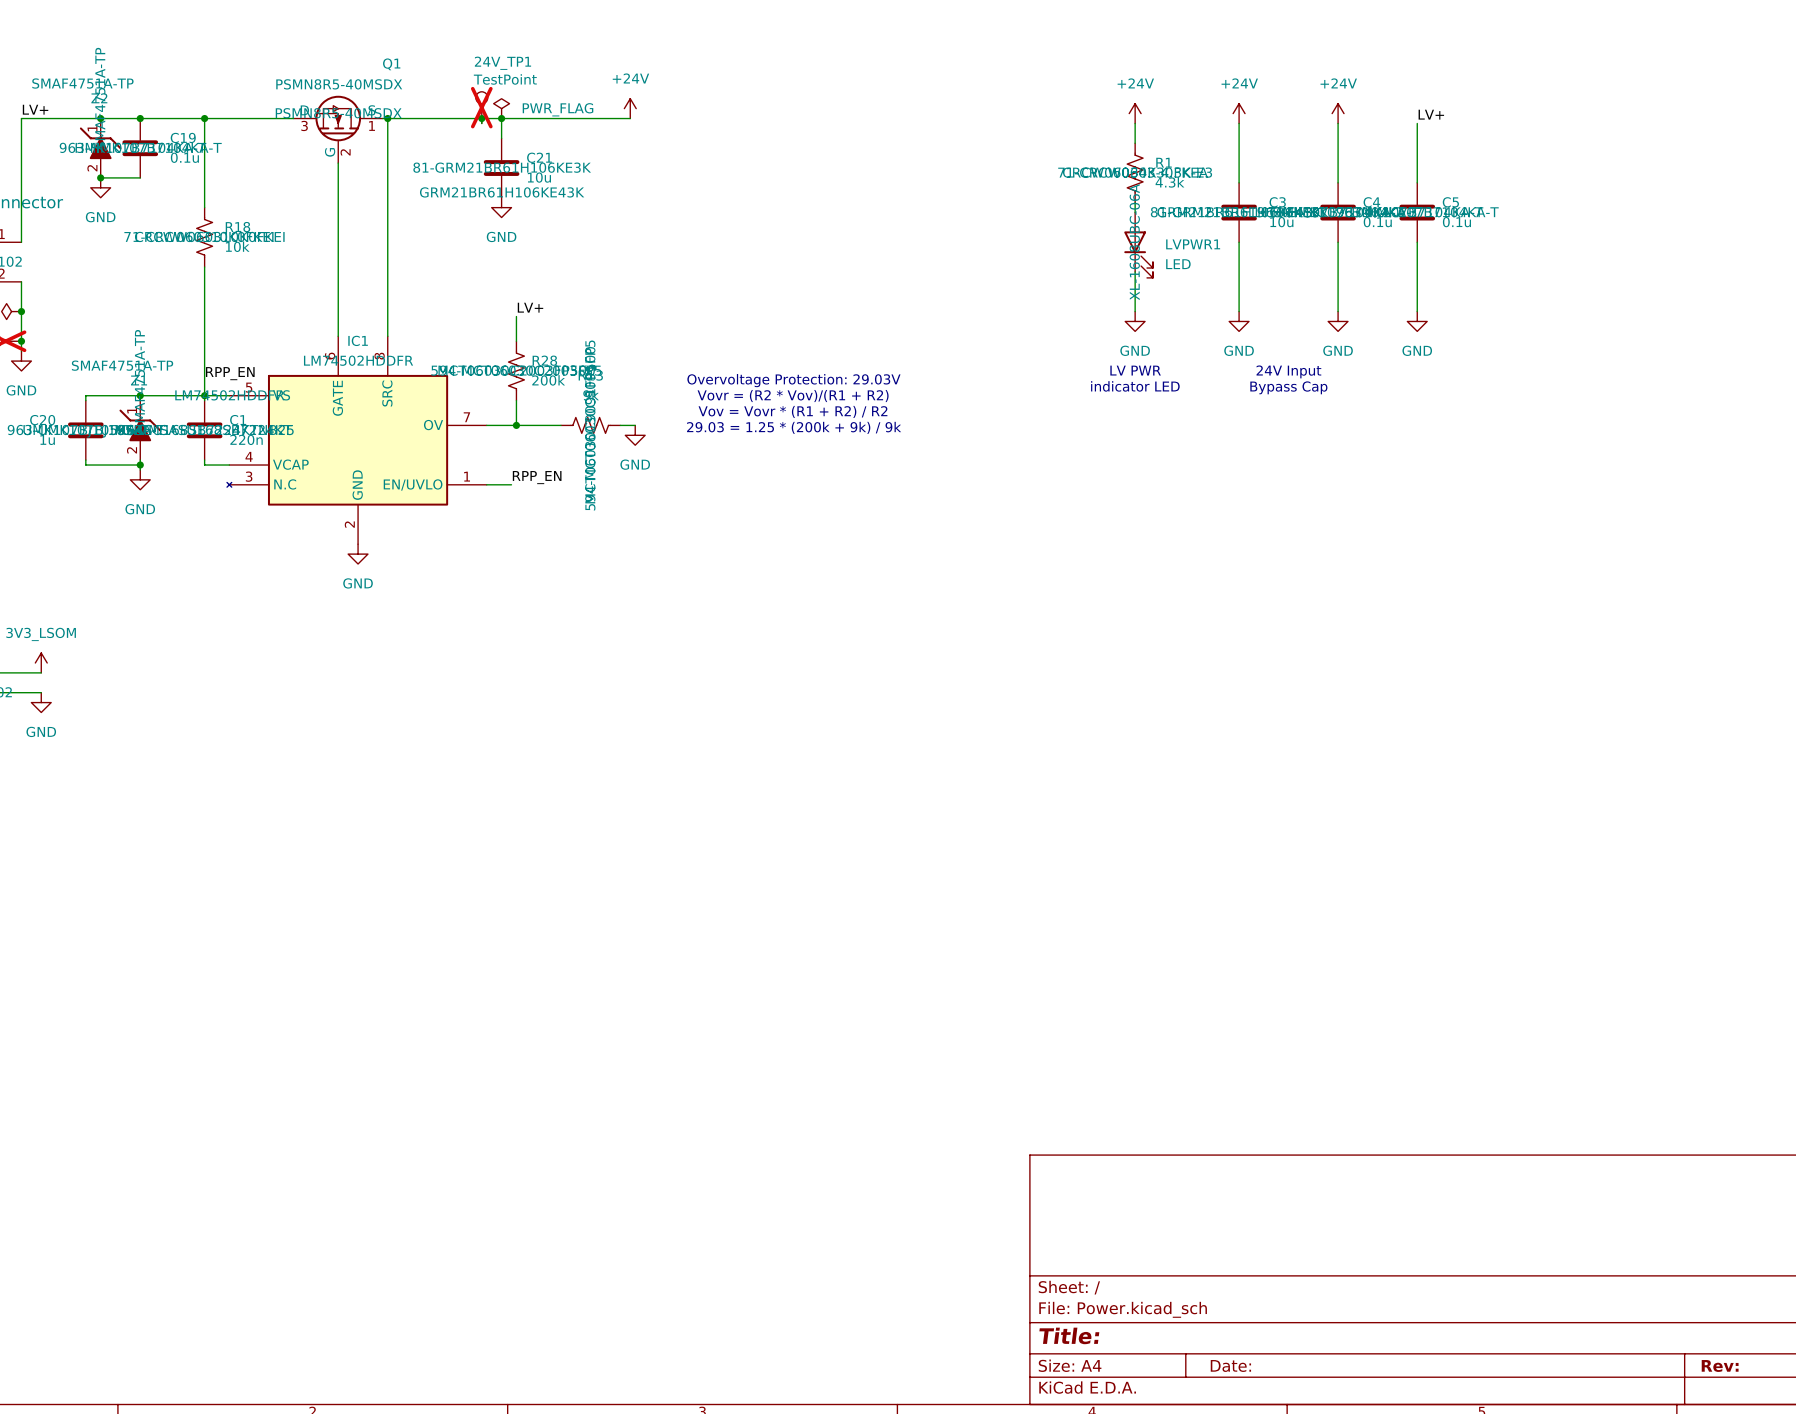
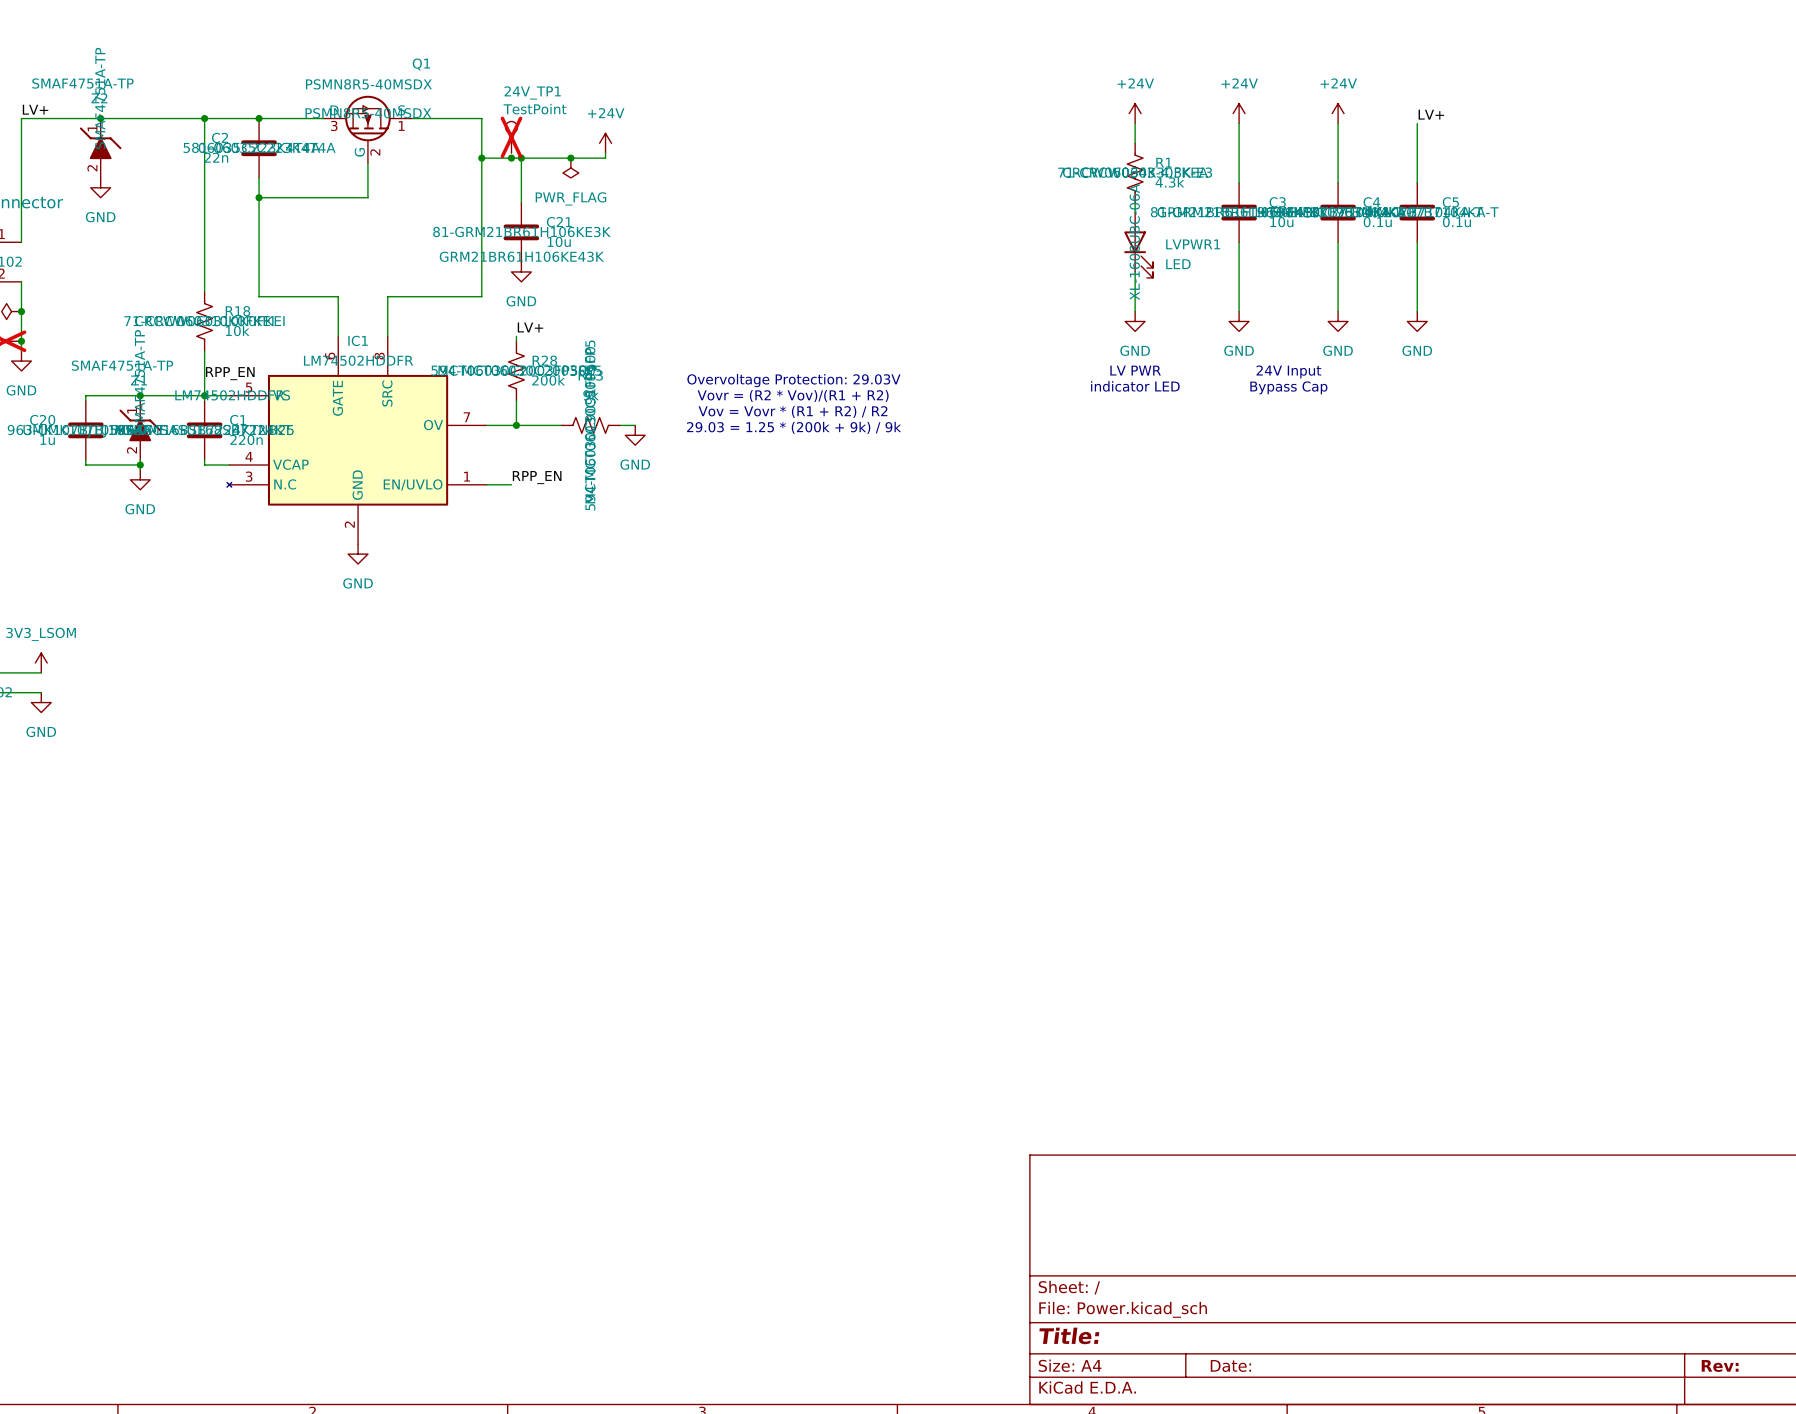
24V_TP1 position: (481, 107) -> (511, 137)
power symbol rotation: 0° (501, 108) -> 180° (570, 168)
power symbol position: PWR_FLAG (501, 108) -> PWR_FLAG (570, 168)
power symbol position: +24V (630, 108) -> +24V (605, 143)
power symbol text position: PWR_FLAG (558, 109) -> PWR_FLAG (570, 198)
junction: (140, 118) -> none
junction: none -> (259, 118)
wire: (387, 118) (387, 296) -> (481, 123) (481, 296) (387, 296)
junction: (387, 118) -> none
wire: (481, 118) (630, 118) -> none
junction: (481, 118) -> none
wire: (501, 118) (501, 138) -> none
junction: (501, 118) -> none
Q1 position: (338, 129) -> (367, 129)
C19: 0.1u (140, 148) -> none
C2: none -> 22n (259, 148)
wire: none -> (605, 153) (605, 158) (481, 158)
junction: none -> (481, 158)
junction: none -> (511, 158)
wire: none -> (521, 158) (521, 202)
junction: none -> (521, 158)
junction: none -> (570, 158)
wire: (338, 163) (338, 296) -> (259, 177) (259, 296) (338, 296)
wire: none -> (367, 163) (367, 197) (259, 197)
C21 position: (501, 168) -> (521, 232)
wire: (100, 177) (140, 177) -> none
junction: (100, 177) -> none
junction: none -> (259, 197)
power symbol position: GND (501, 207) -> GND (521, 271)
R18 position: (204, 237) -> (204, 321)
label position: LV+ (530, 307) -> LV+ (530, 327)
wire: (516, 316) (516, 336) -> none

